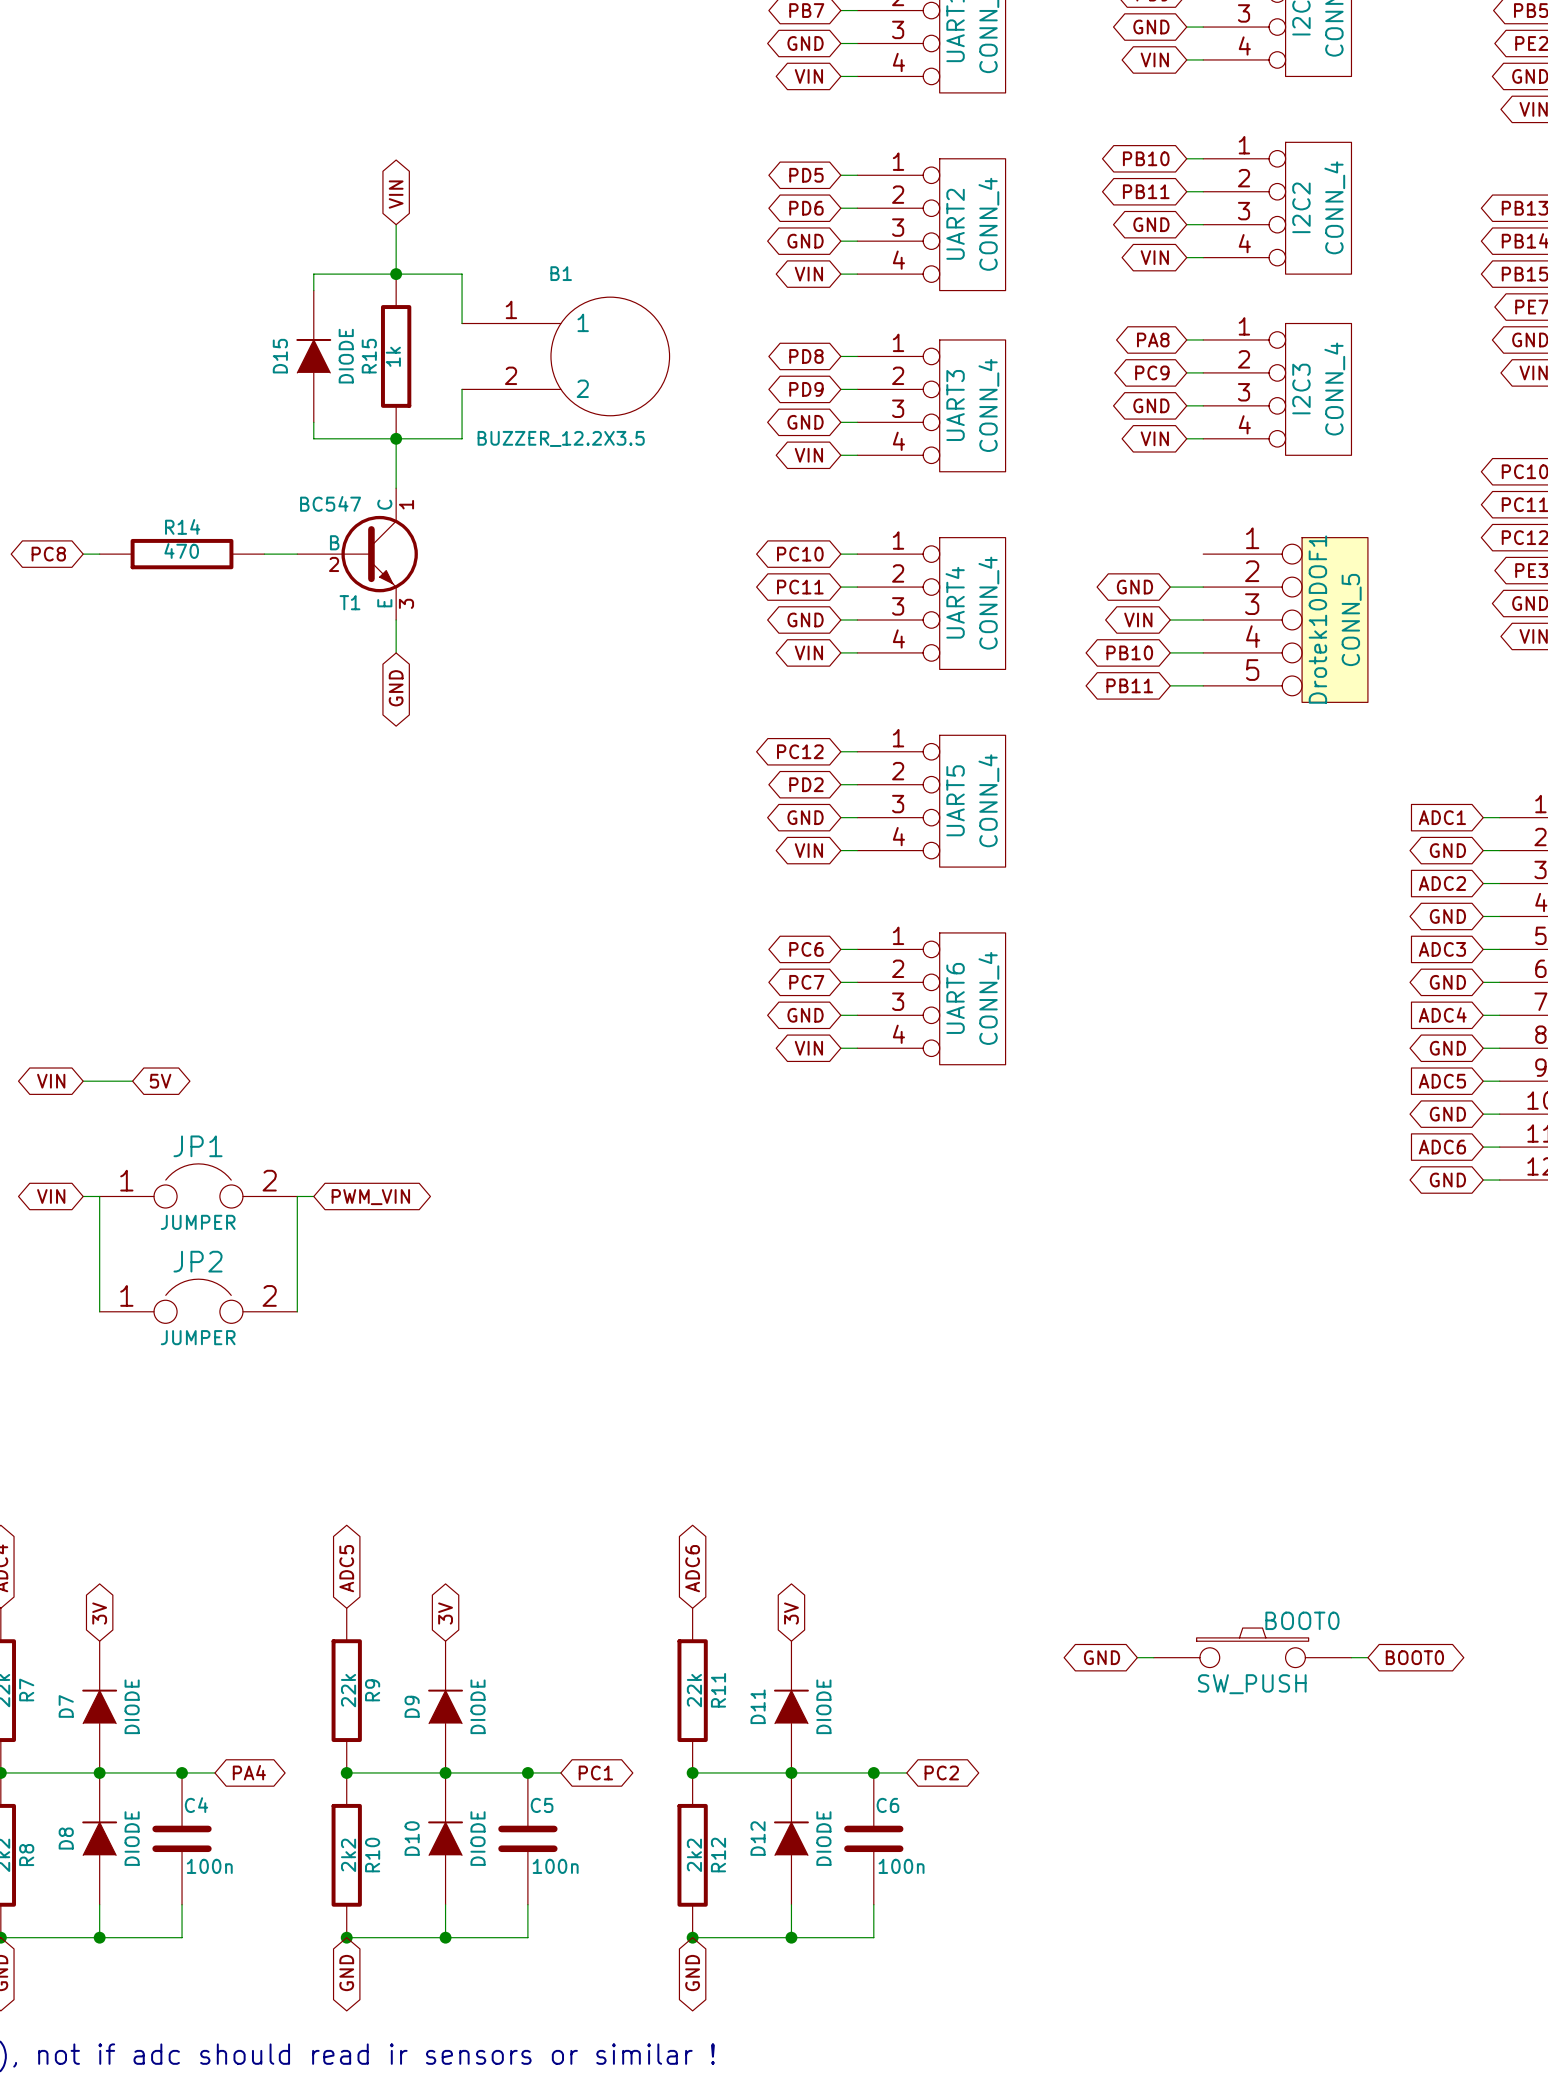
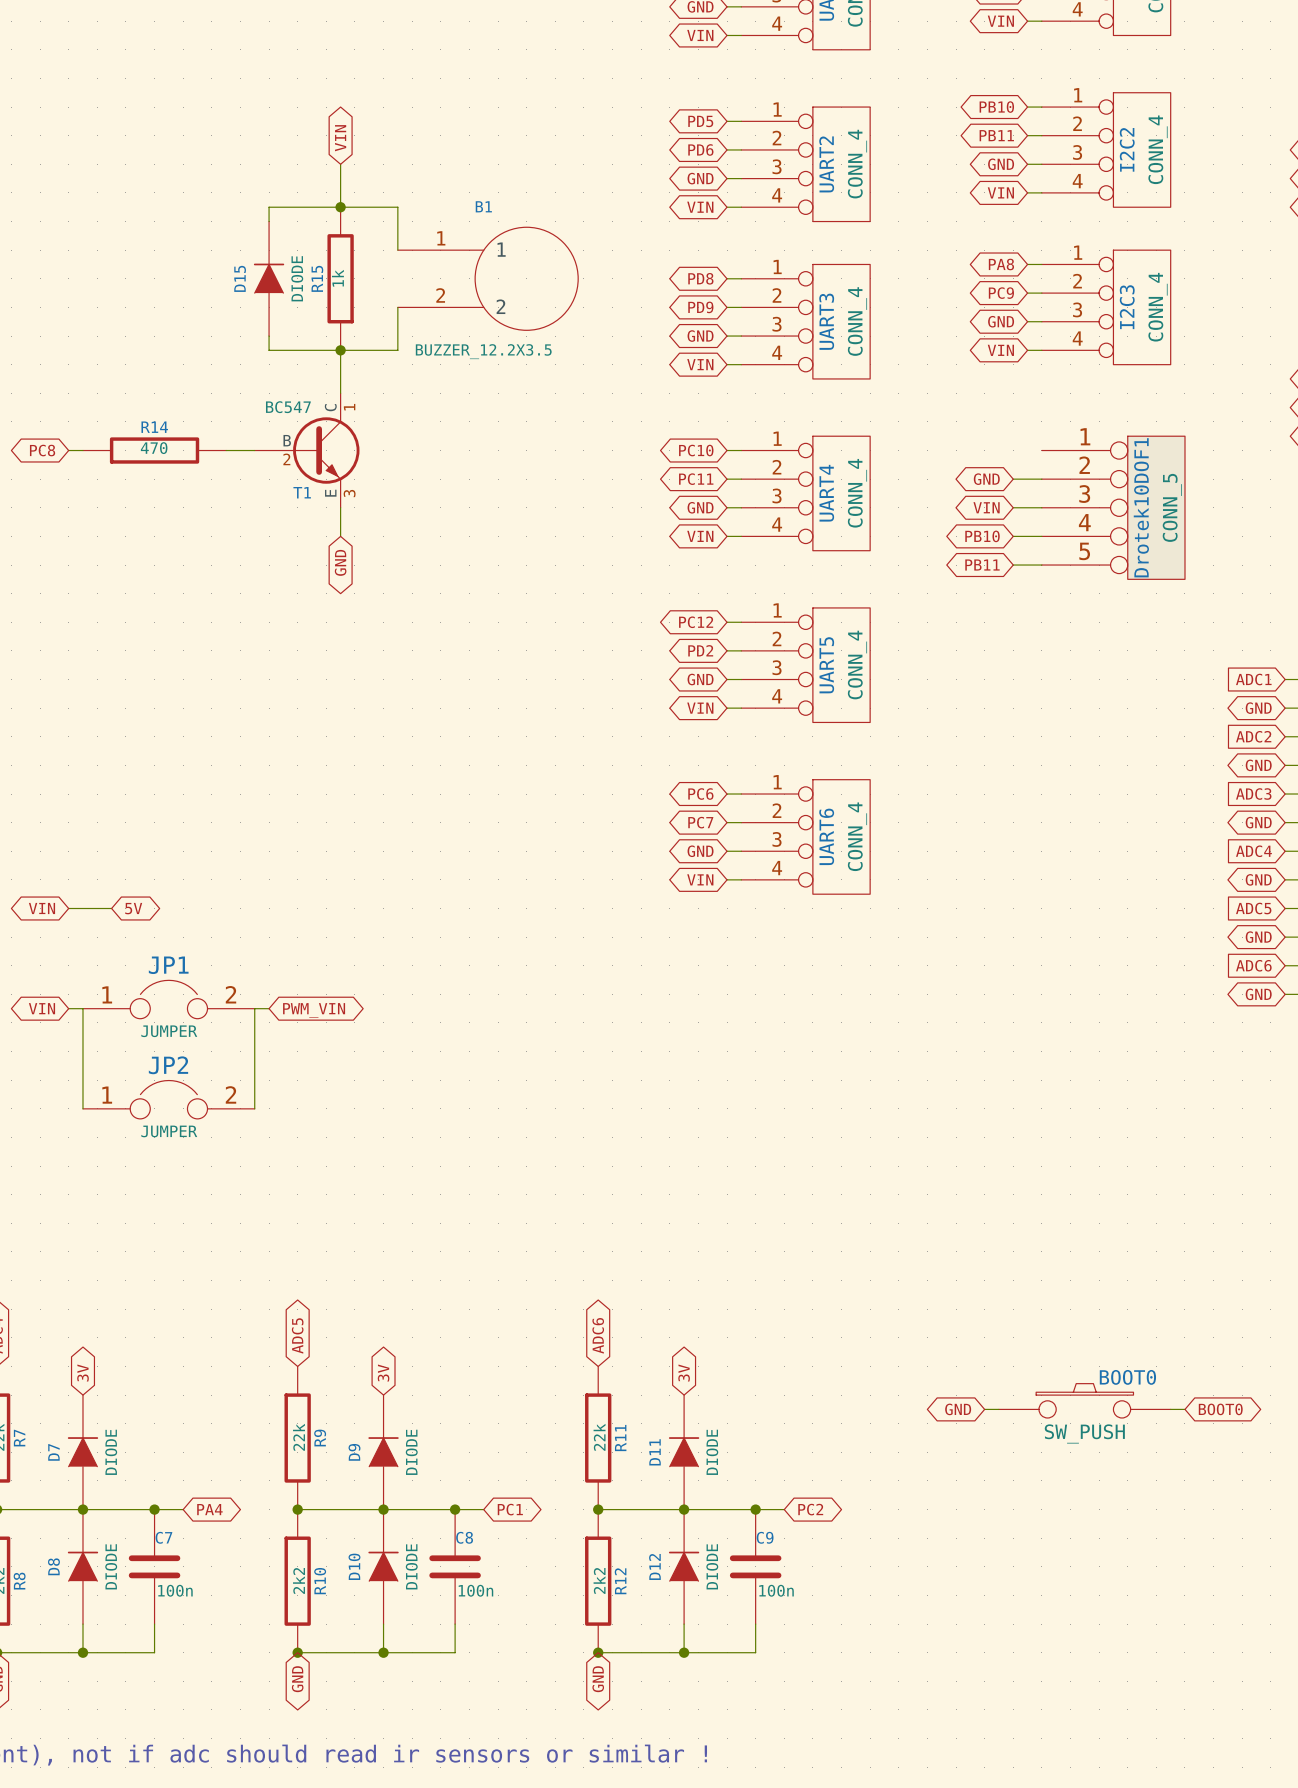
C4 name: C4 (196, 1805) -> C7 (163, 1537)
C5 name: C5 (542, 1805) -> C8 (464, 1537)
C6 name: C6 (887, 1805) -> C9 (765, 1537)

